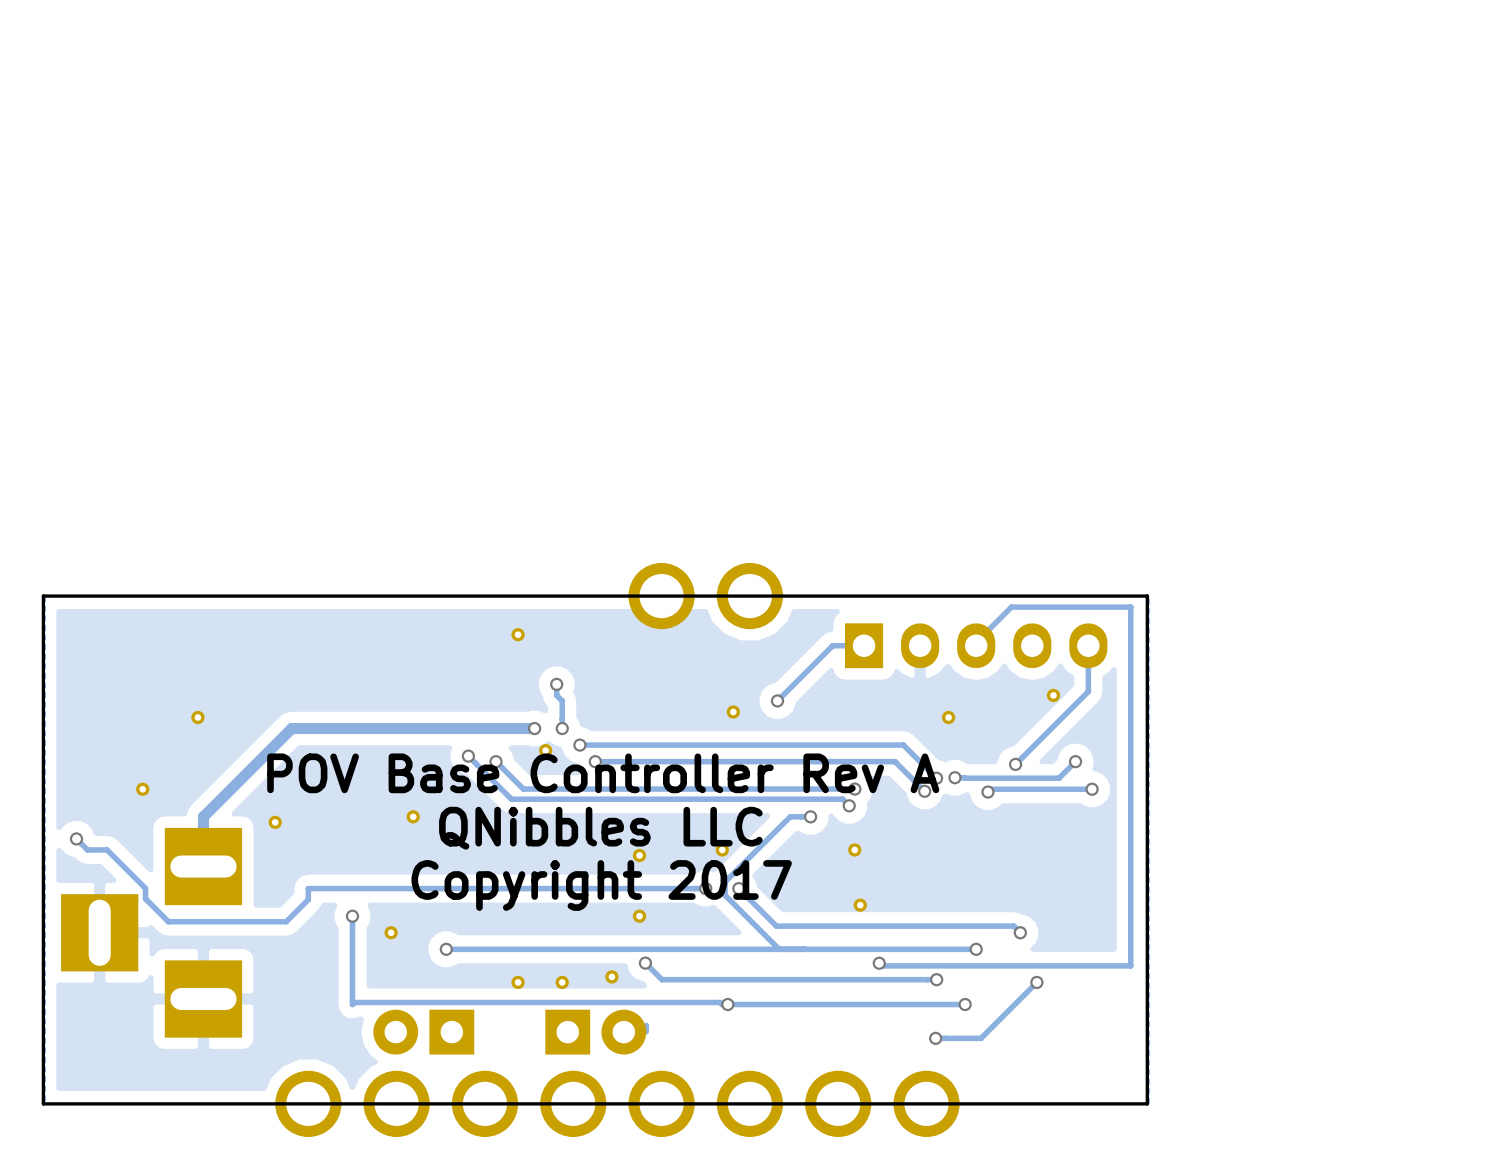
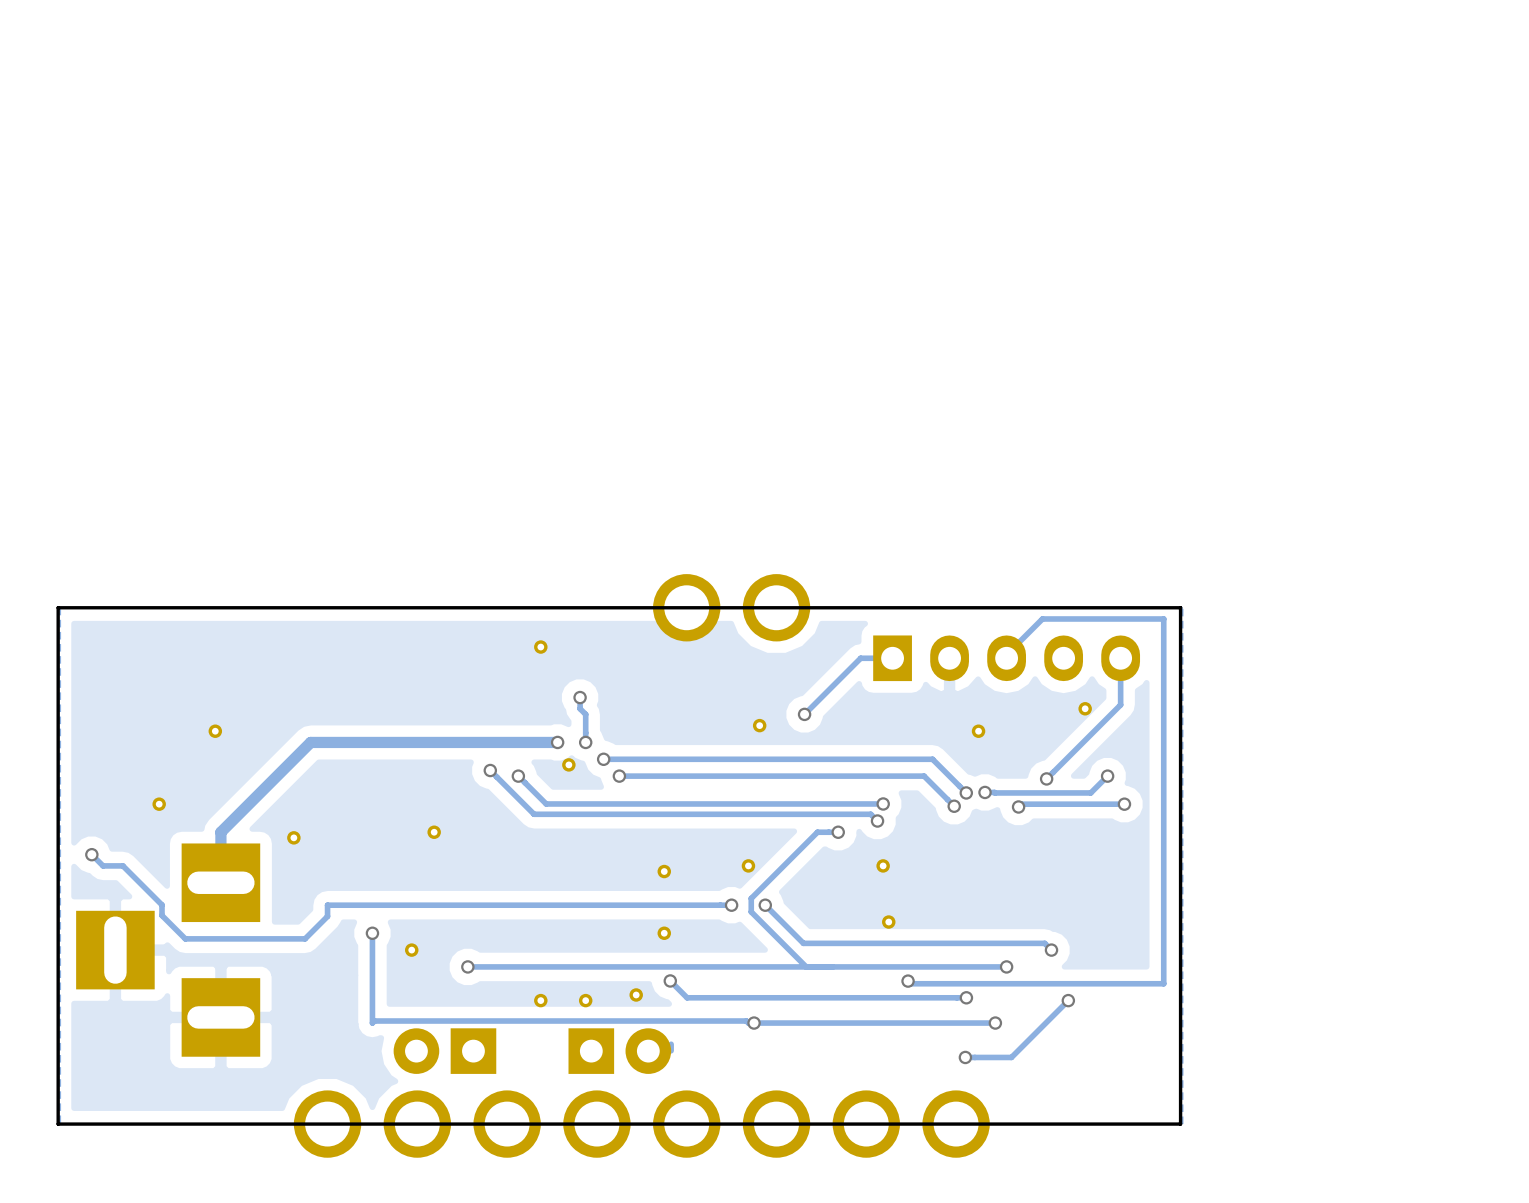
text: POV Base Controller Rev A (603, 773) -> none
text: QNibbles LLC (600, 828) -> none
text: Copyright 2017 (601, 885) -> none

